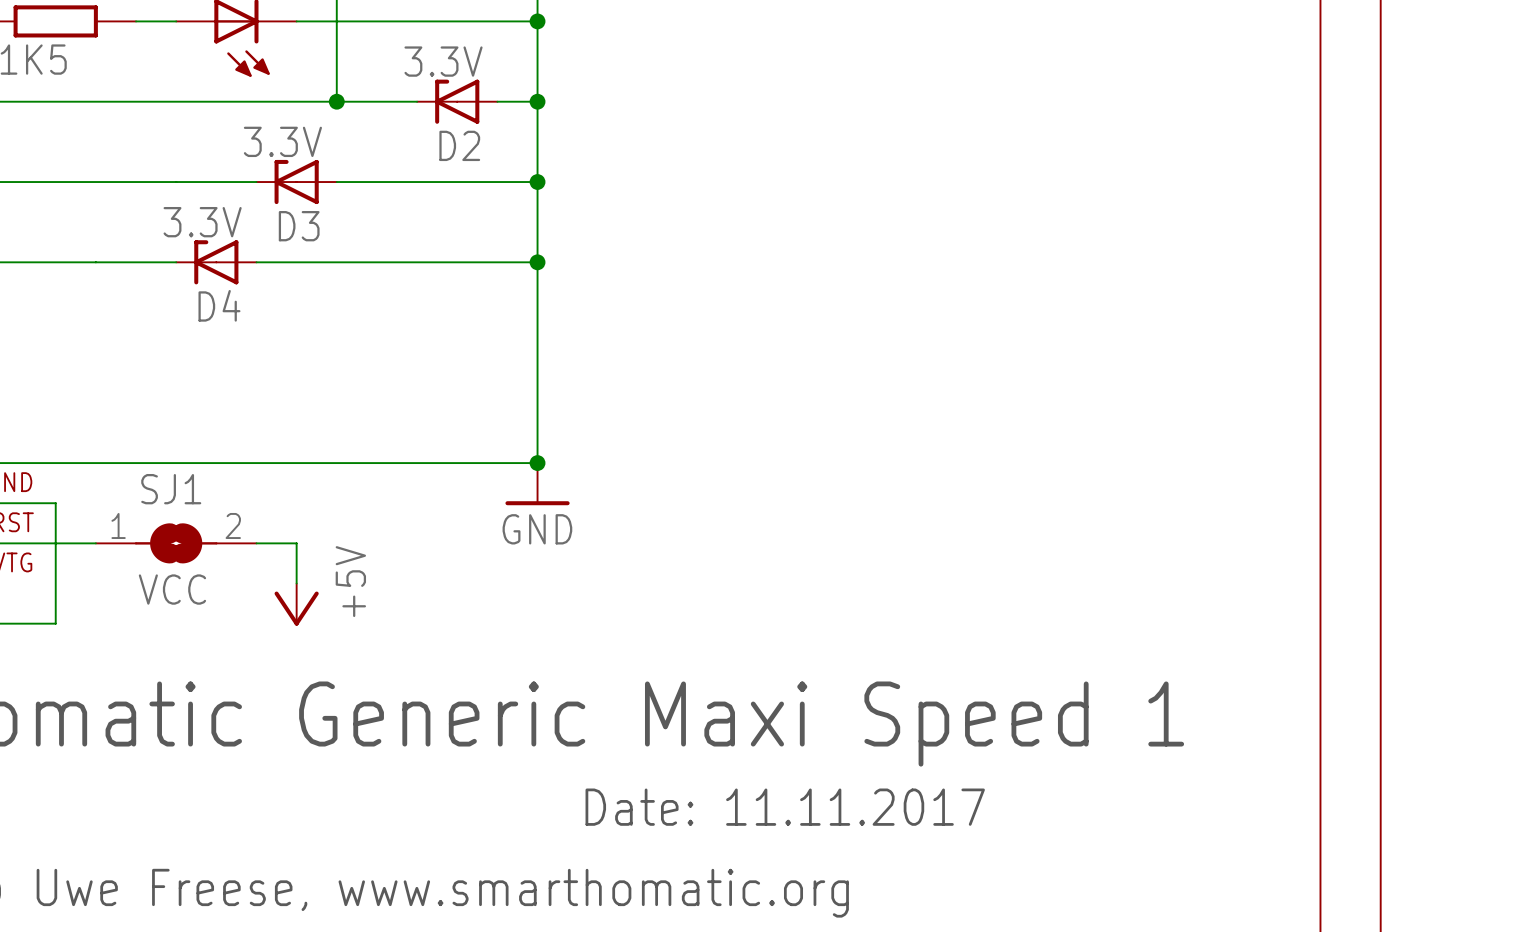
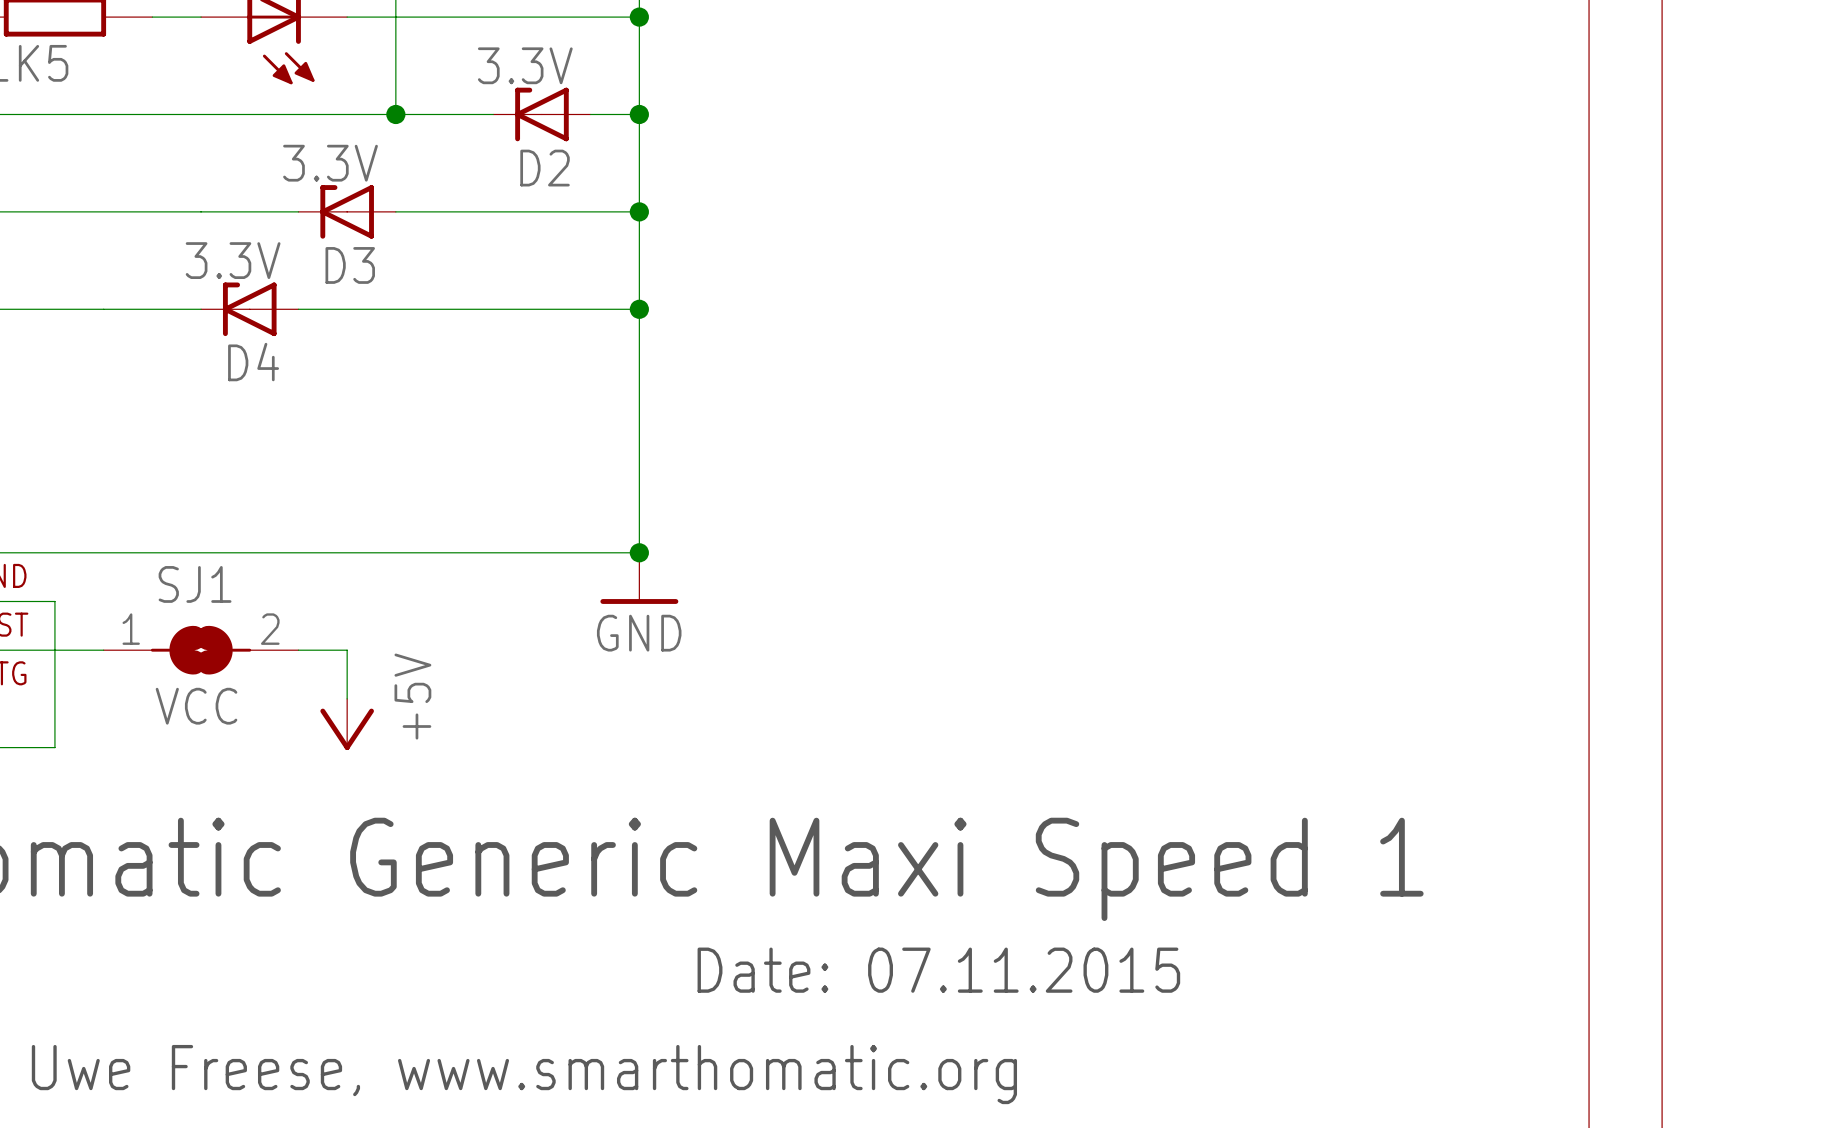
text: Date: 11.11.2017 (785, 807) -> Date: 07.11.2015 (938, 970)

